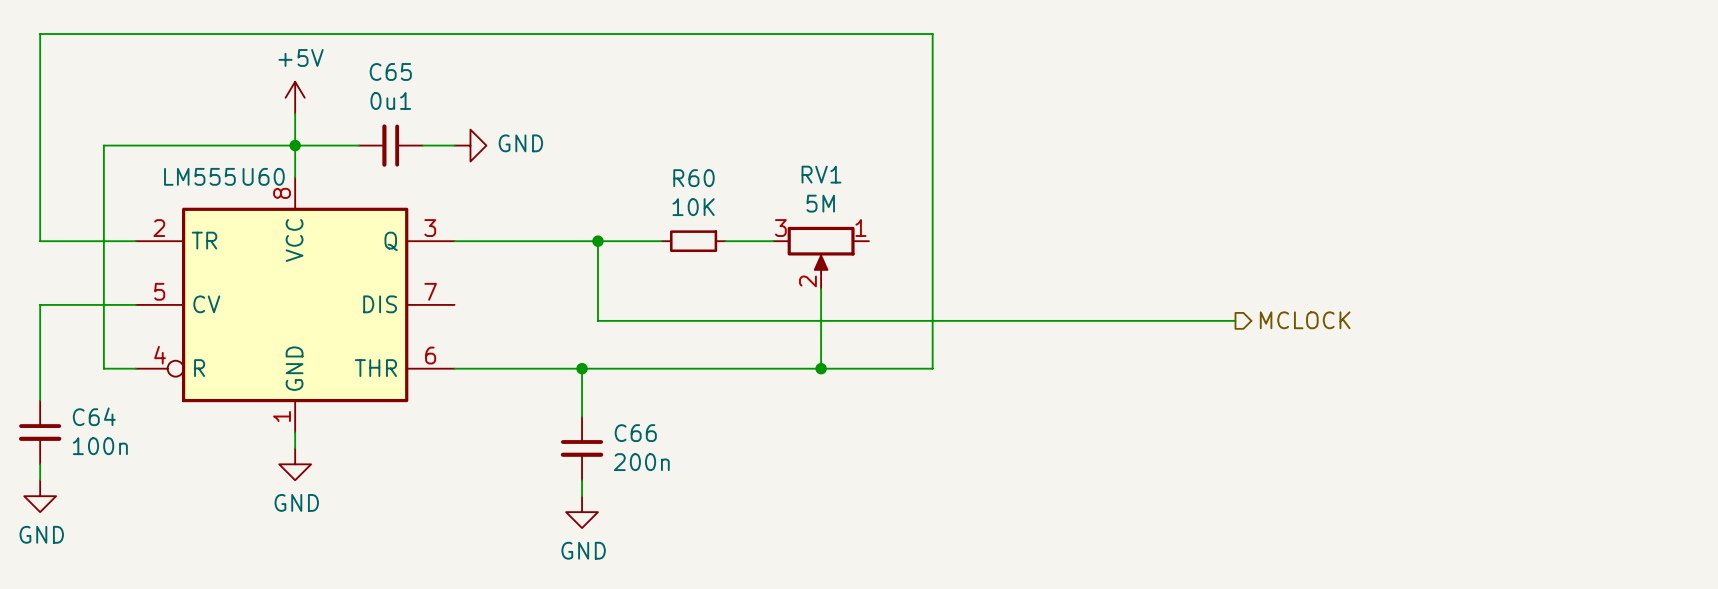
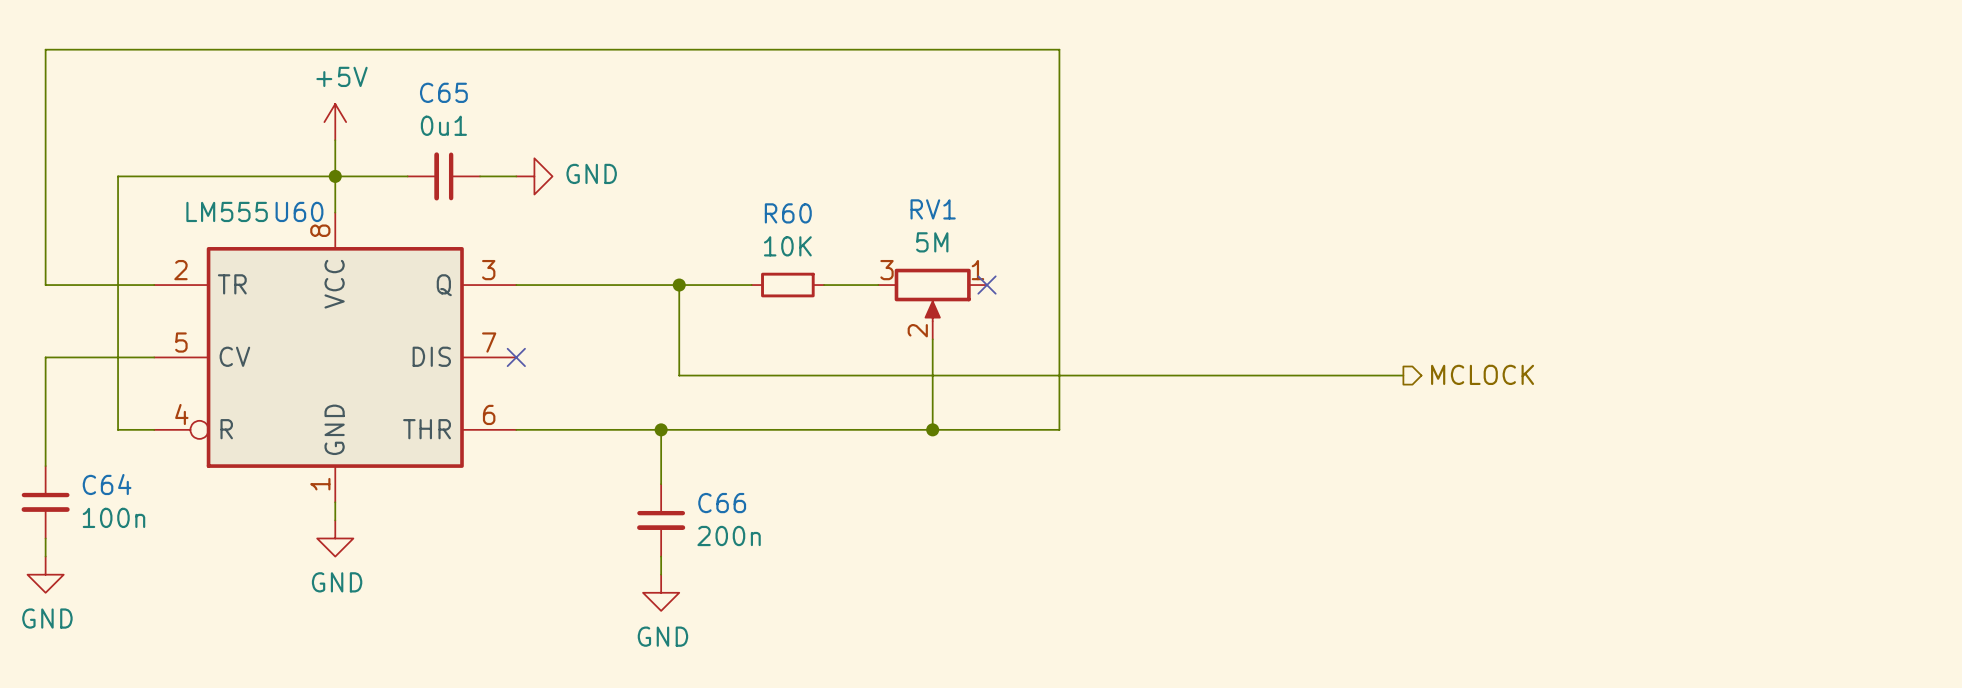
no-connect mark: none -> (987, 285)
no-connect mark: none -> (516, 357)

